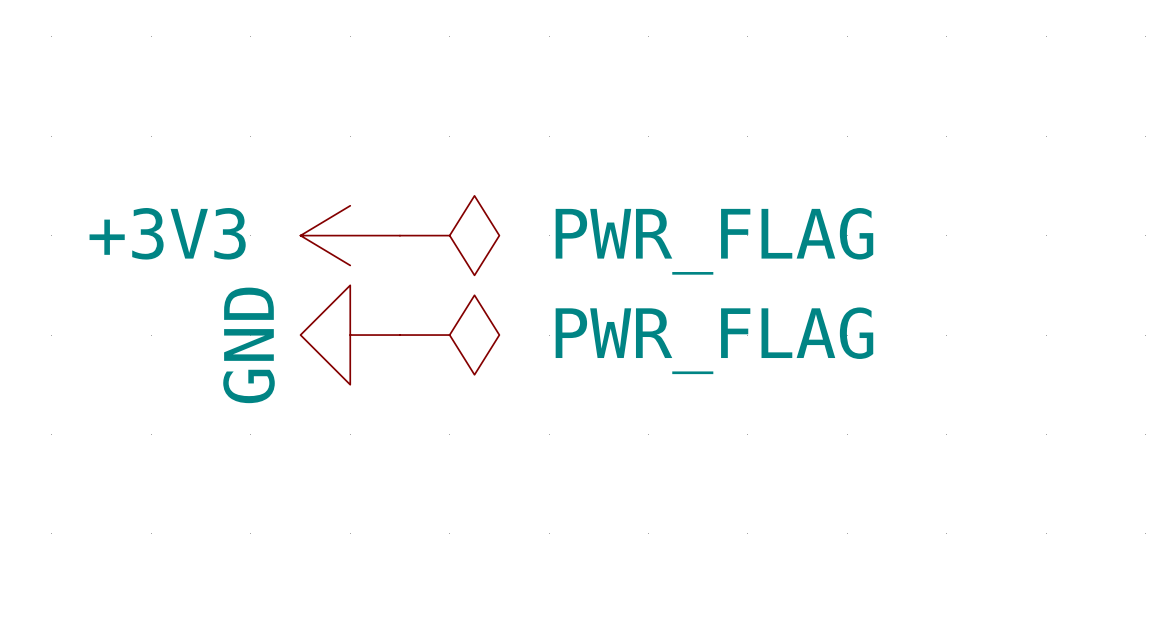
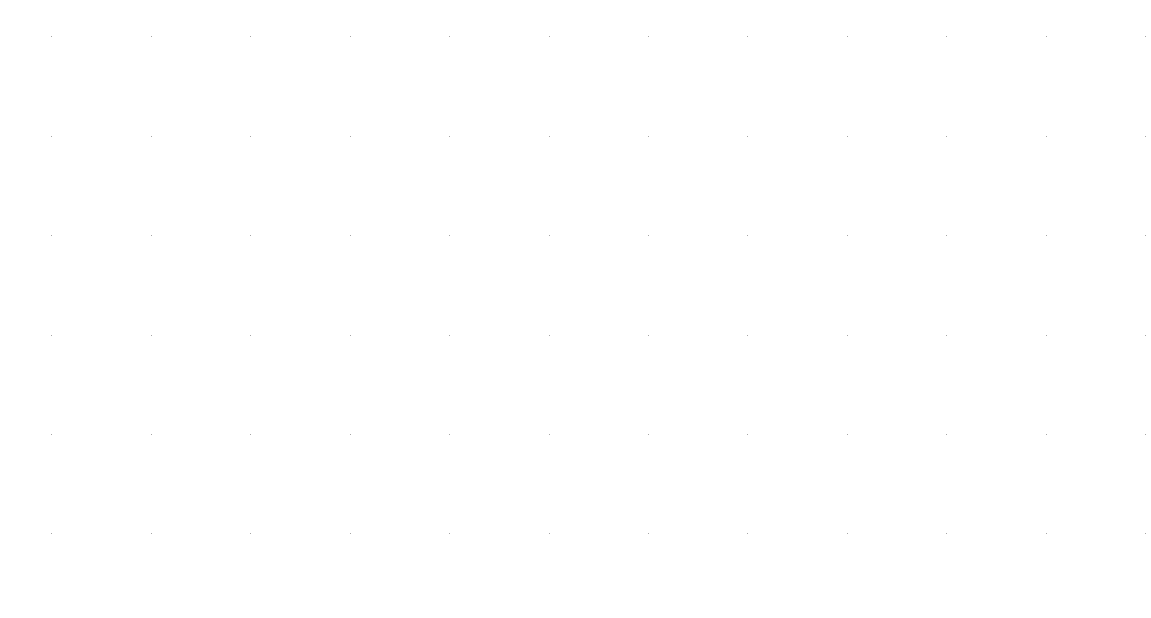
power symbol: +3V3 (350, 235) -> none
power symbol: PWR_FLAG (449, 235) -> none
power symbol: GND (350, 335) -> none
power symbol: PWR_FLAG (449, 335) -> none

